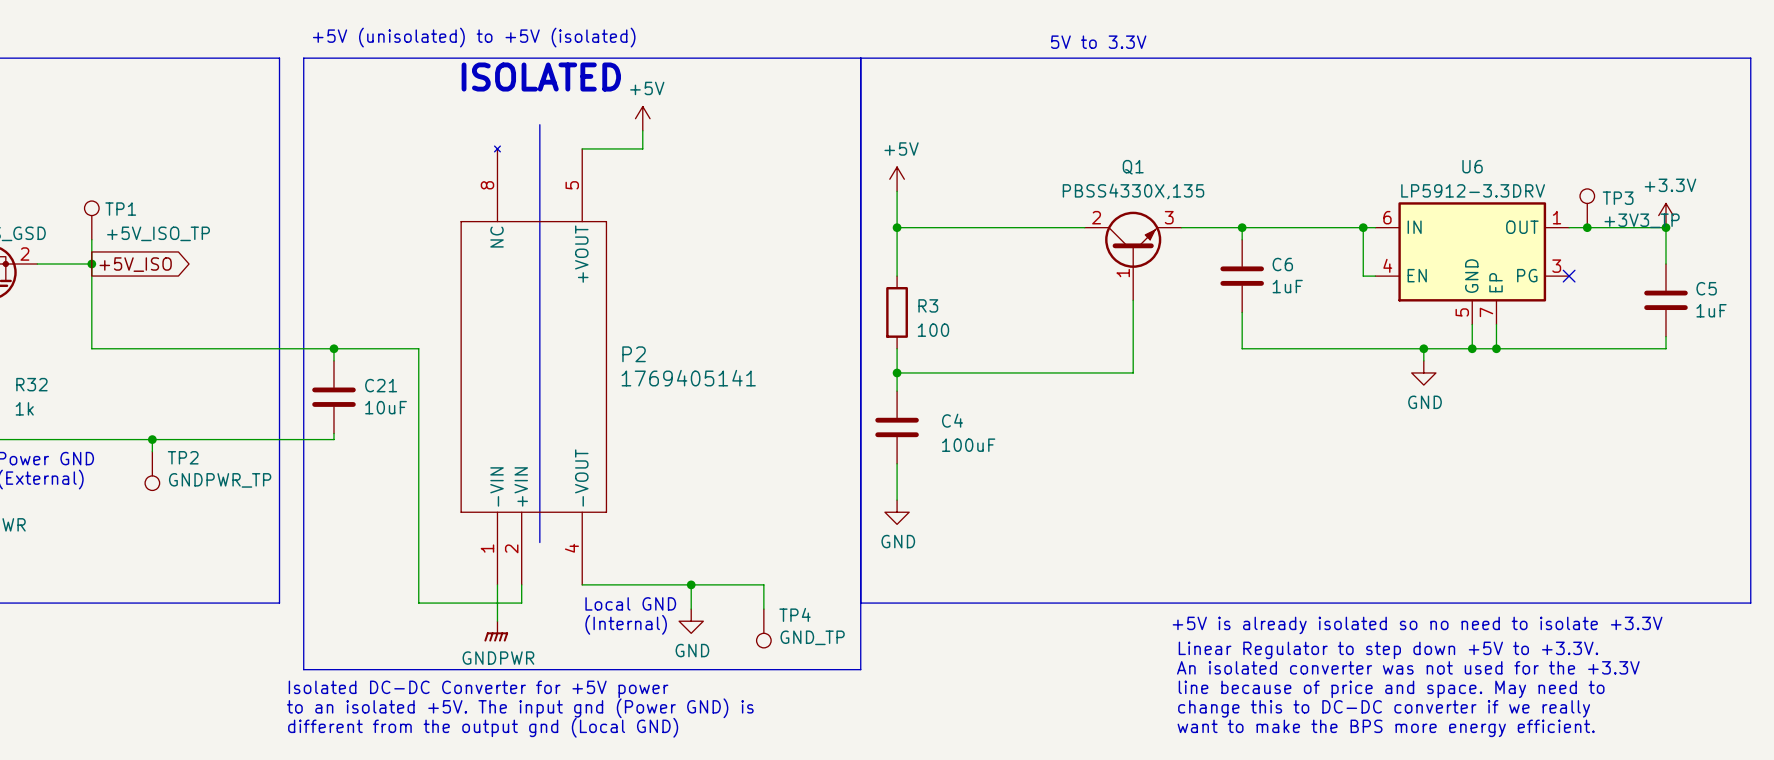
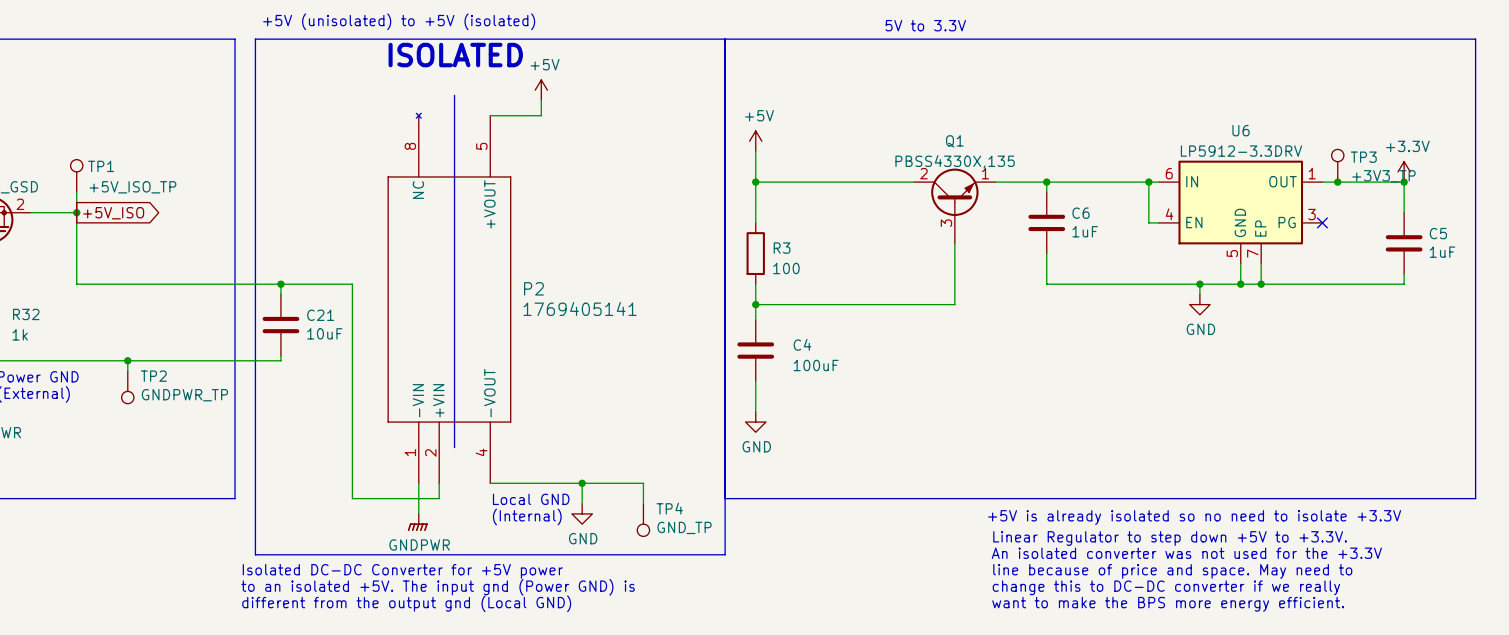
Q1 symbol: [1084, 211, 1182, 301] -> [914, 168, 996, 244]

